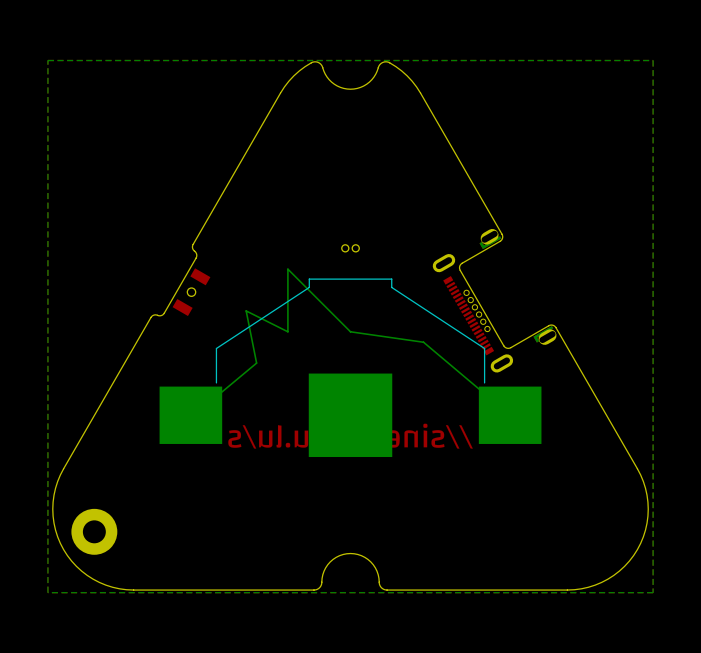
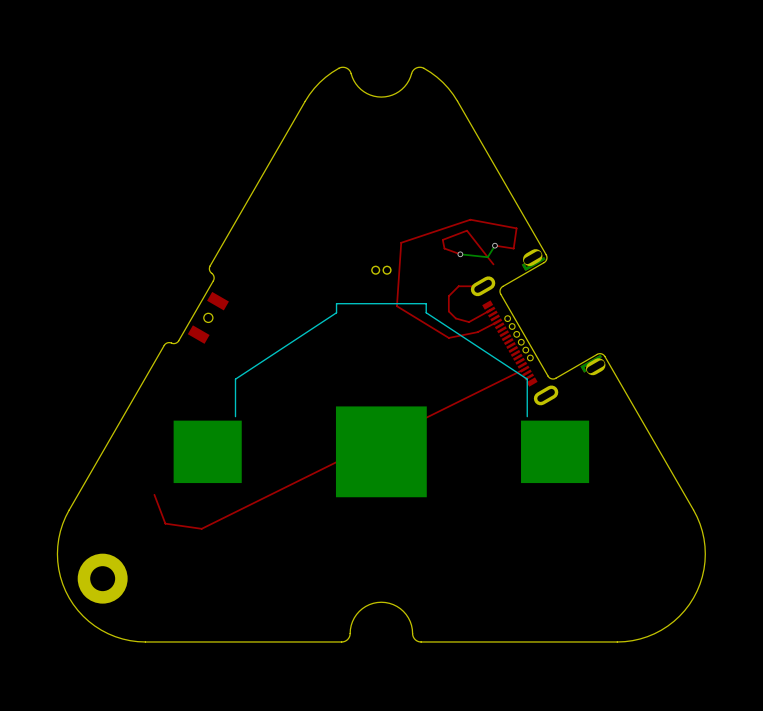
bottom zone outline: (653, 60) (653, 592) (47, 592) (47, 60) (653, 60) -> none
bottom track: none -> (494, 245) (487, 257) (460, 254)
top track: none -> (494, 245) (513, 248) (516, 228) (470, 219) (401, 242) (396, 306) (448, 337) (477, 332) (497, 321)
via: none -> (494, 245)
top track: none -> (460, 254) (444, 248) (442, 239) (467, 230) (493, 264)
via: none -> (460, 254)
top track: none -> (483, 286) (458, 286) (448, 296) (448, 311) (455, 318) (469, 322) (489, 310)
top track: none -> (524, 369) (201, 528) (165, 523) (154, 494)
bottom track: (510, 415) (423, 342) (350, 331) (287, 269) (287, 331) (246, 310) (256, 363) (194, 415) -> none
drawing: [228, 423, 473, 449] -> none

